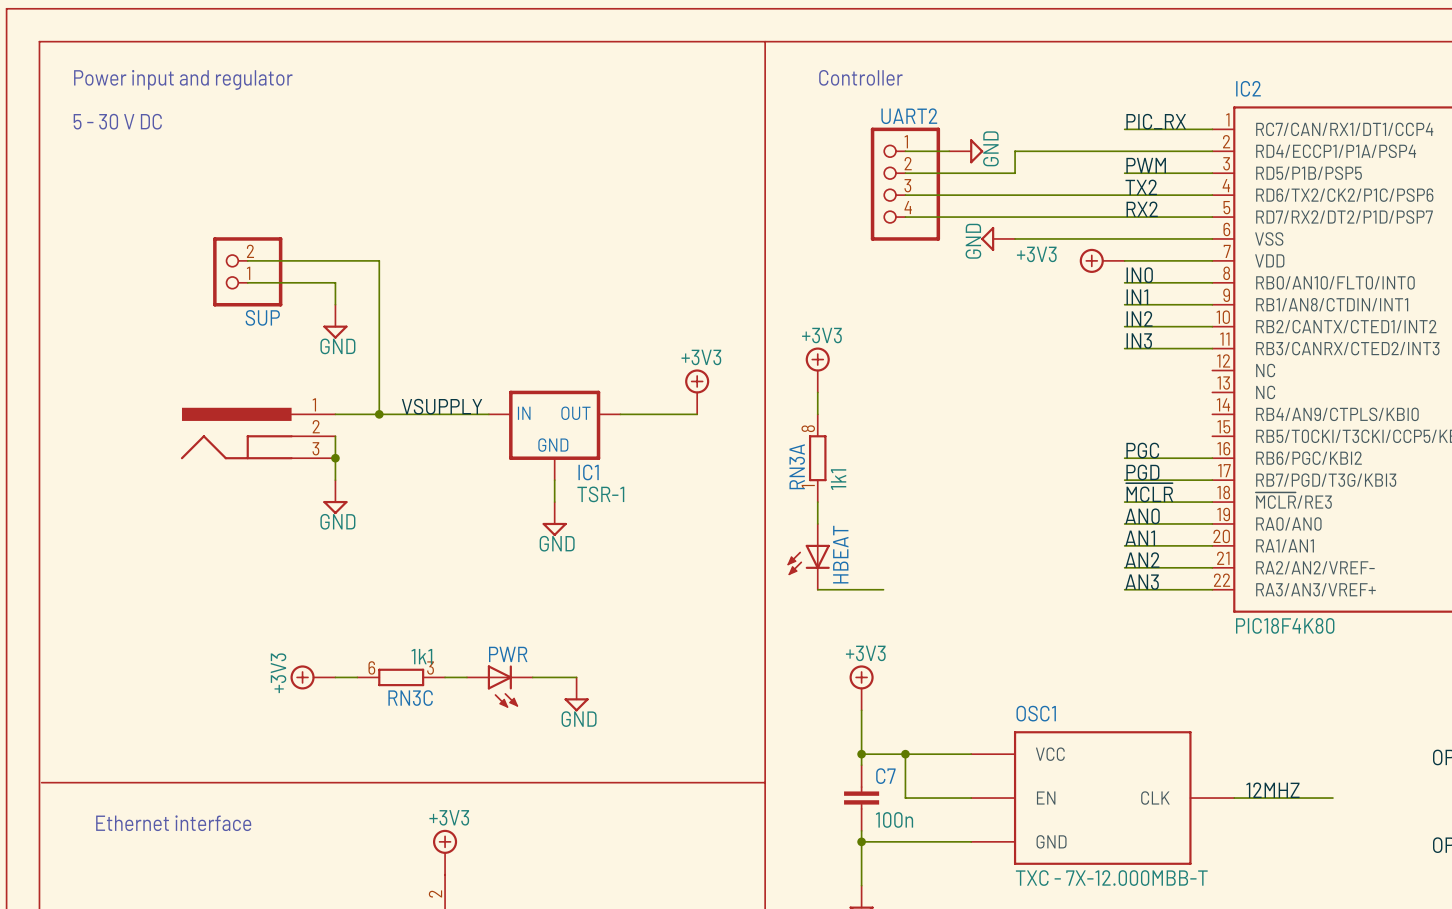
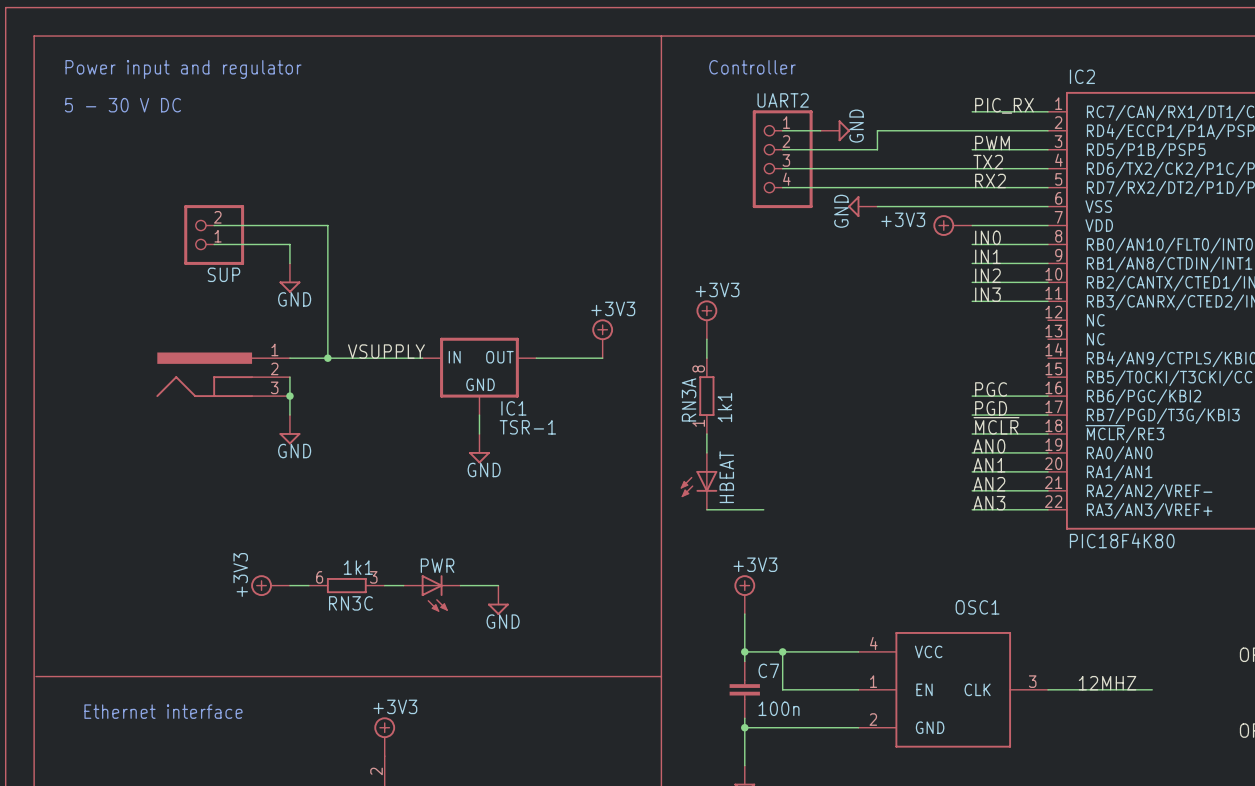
OSC1 name position: OSC1 (1036, 713) -> OSC1 (977, 607)
OSC1 symbol: [971, 731, 1235, 865] -> [858, 632, 1049, 748]
OSC1 value: TXC - 7X-12.000MBB-T (1111, 878) -> none

